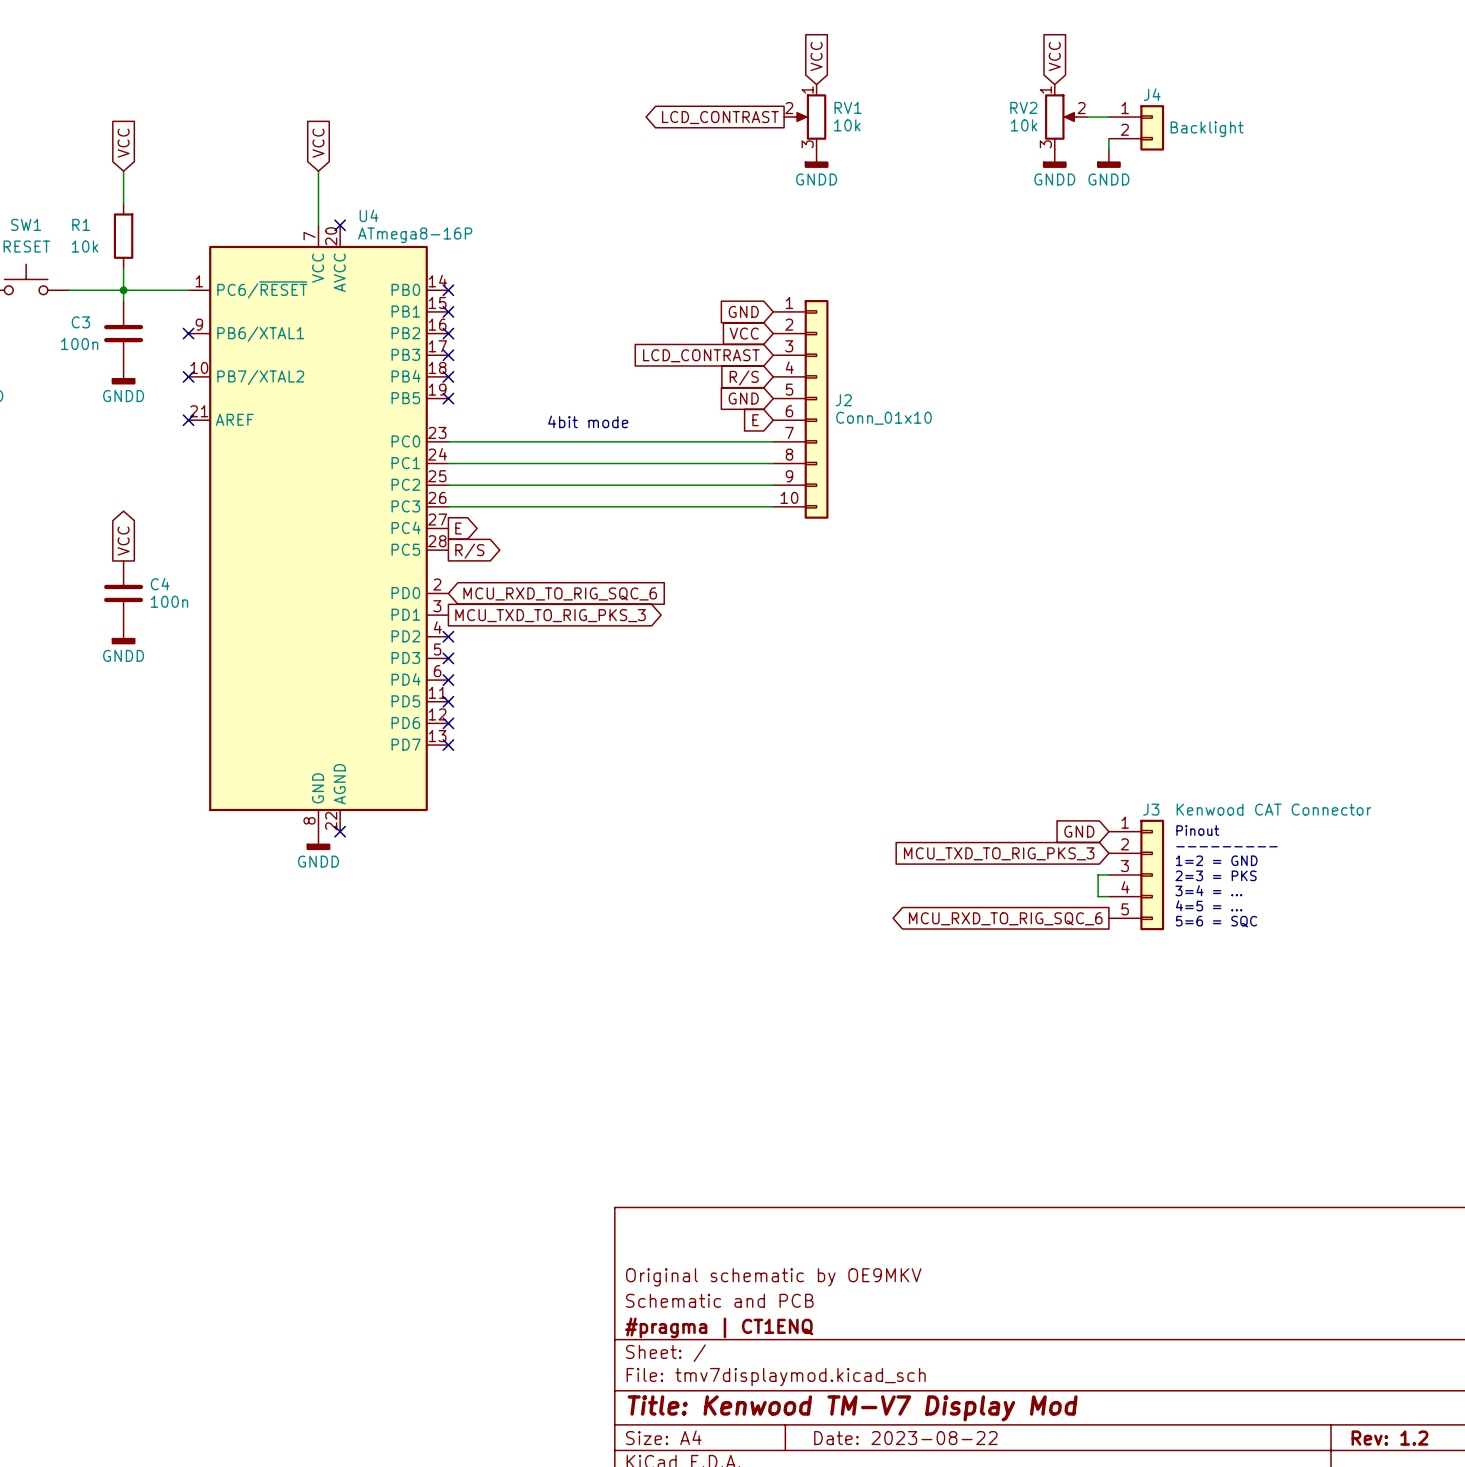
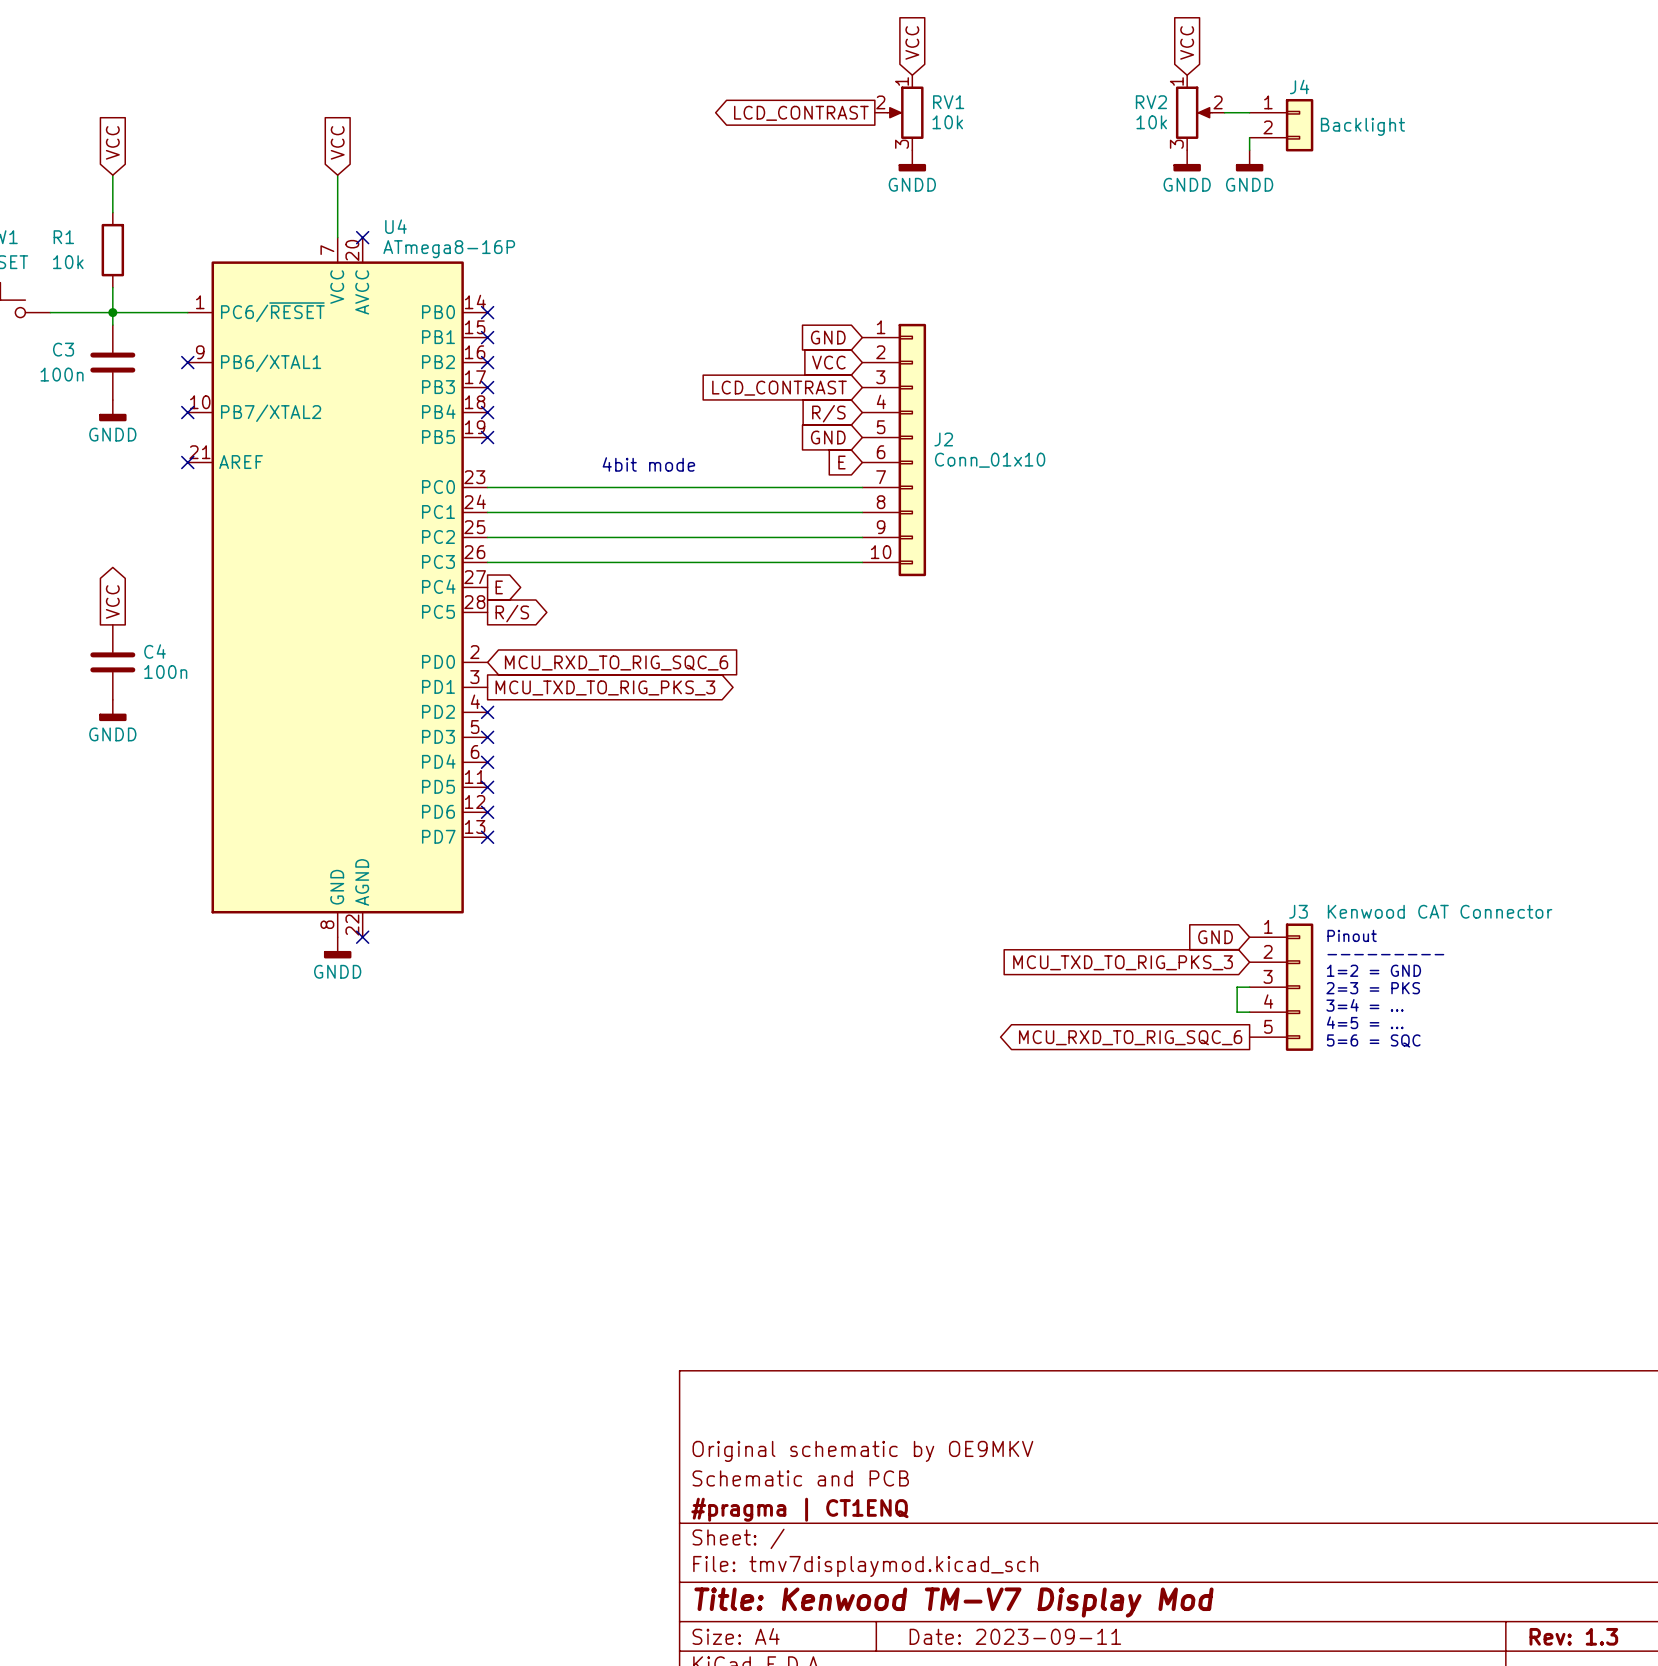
title block: Date: 2023-08-22 (905, 1438) -> Date: 2023-09-11 (1015, 1636)
title block: Rev: 1.2 (1389, 1438) -> Rev: 1.3 (1573, 1636)

